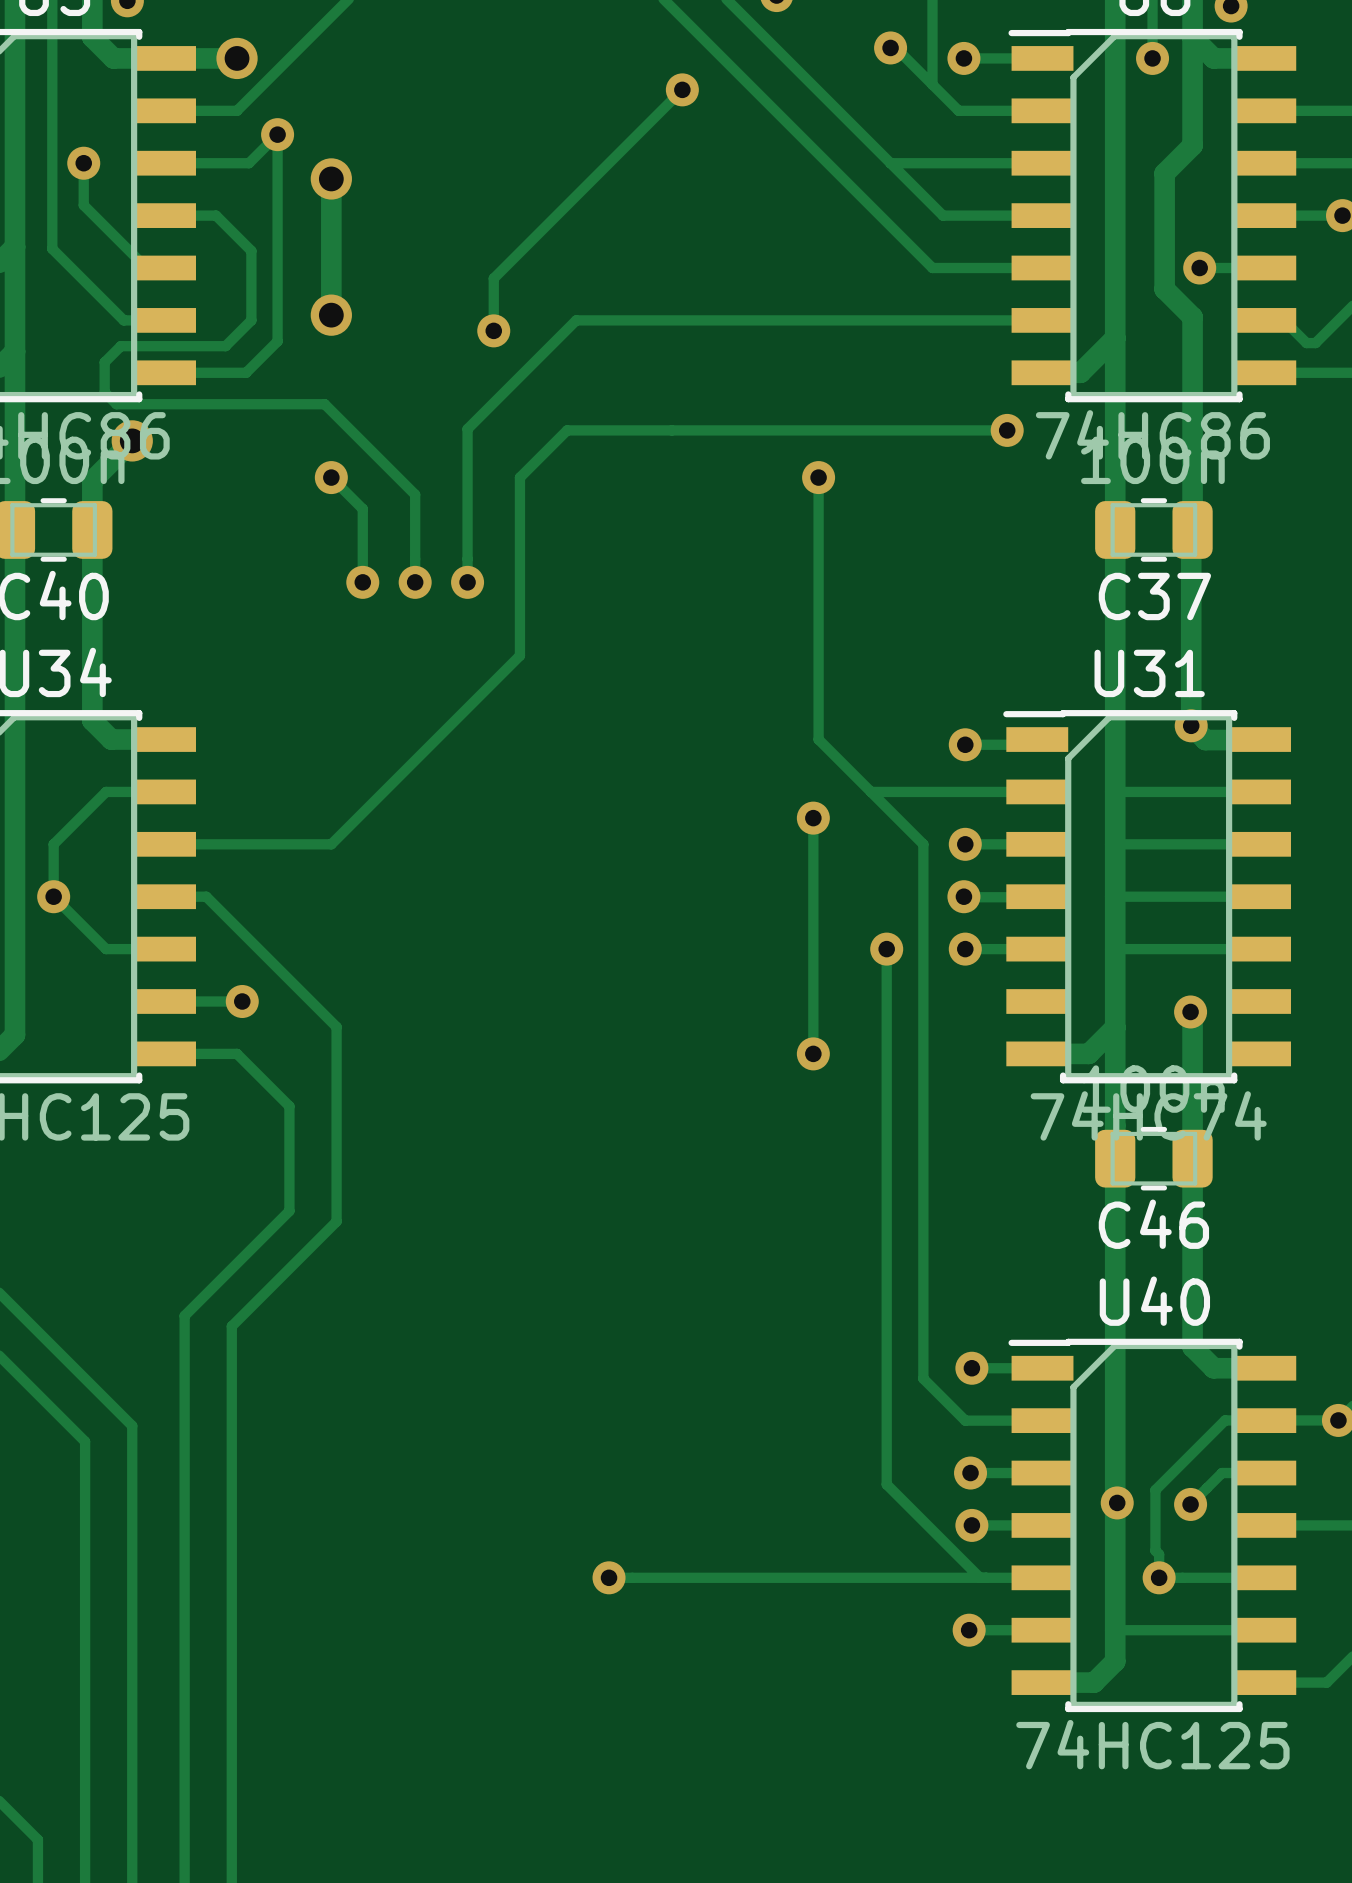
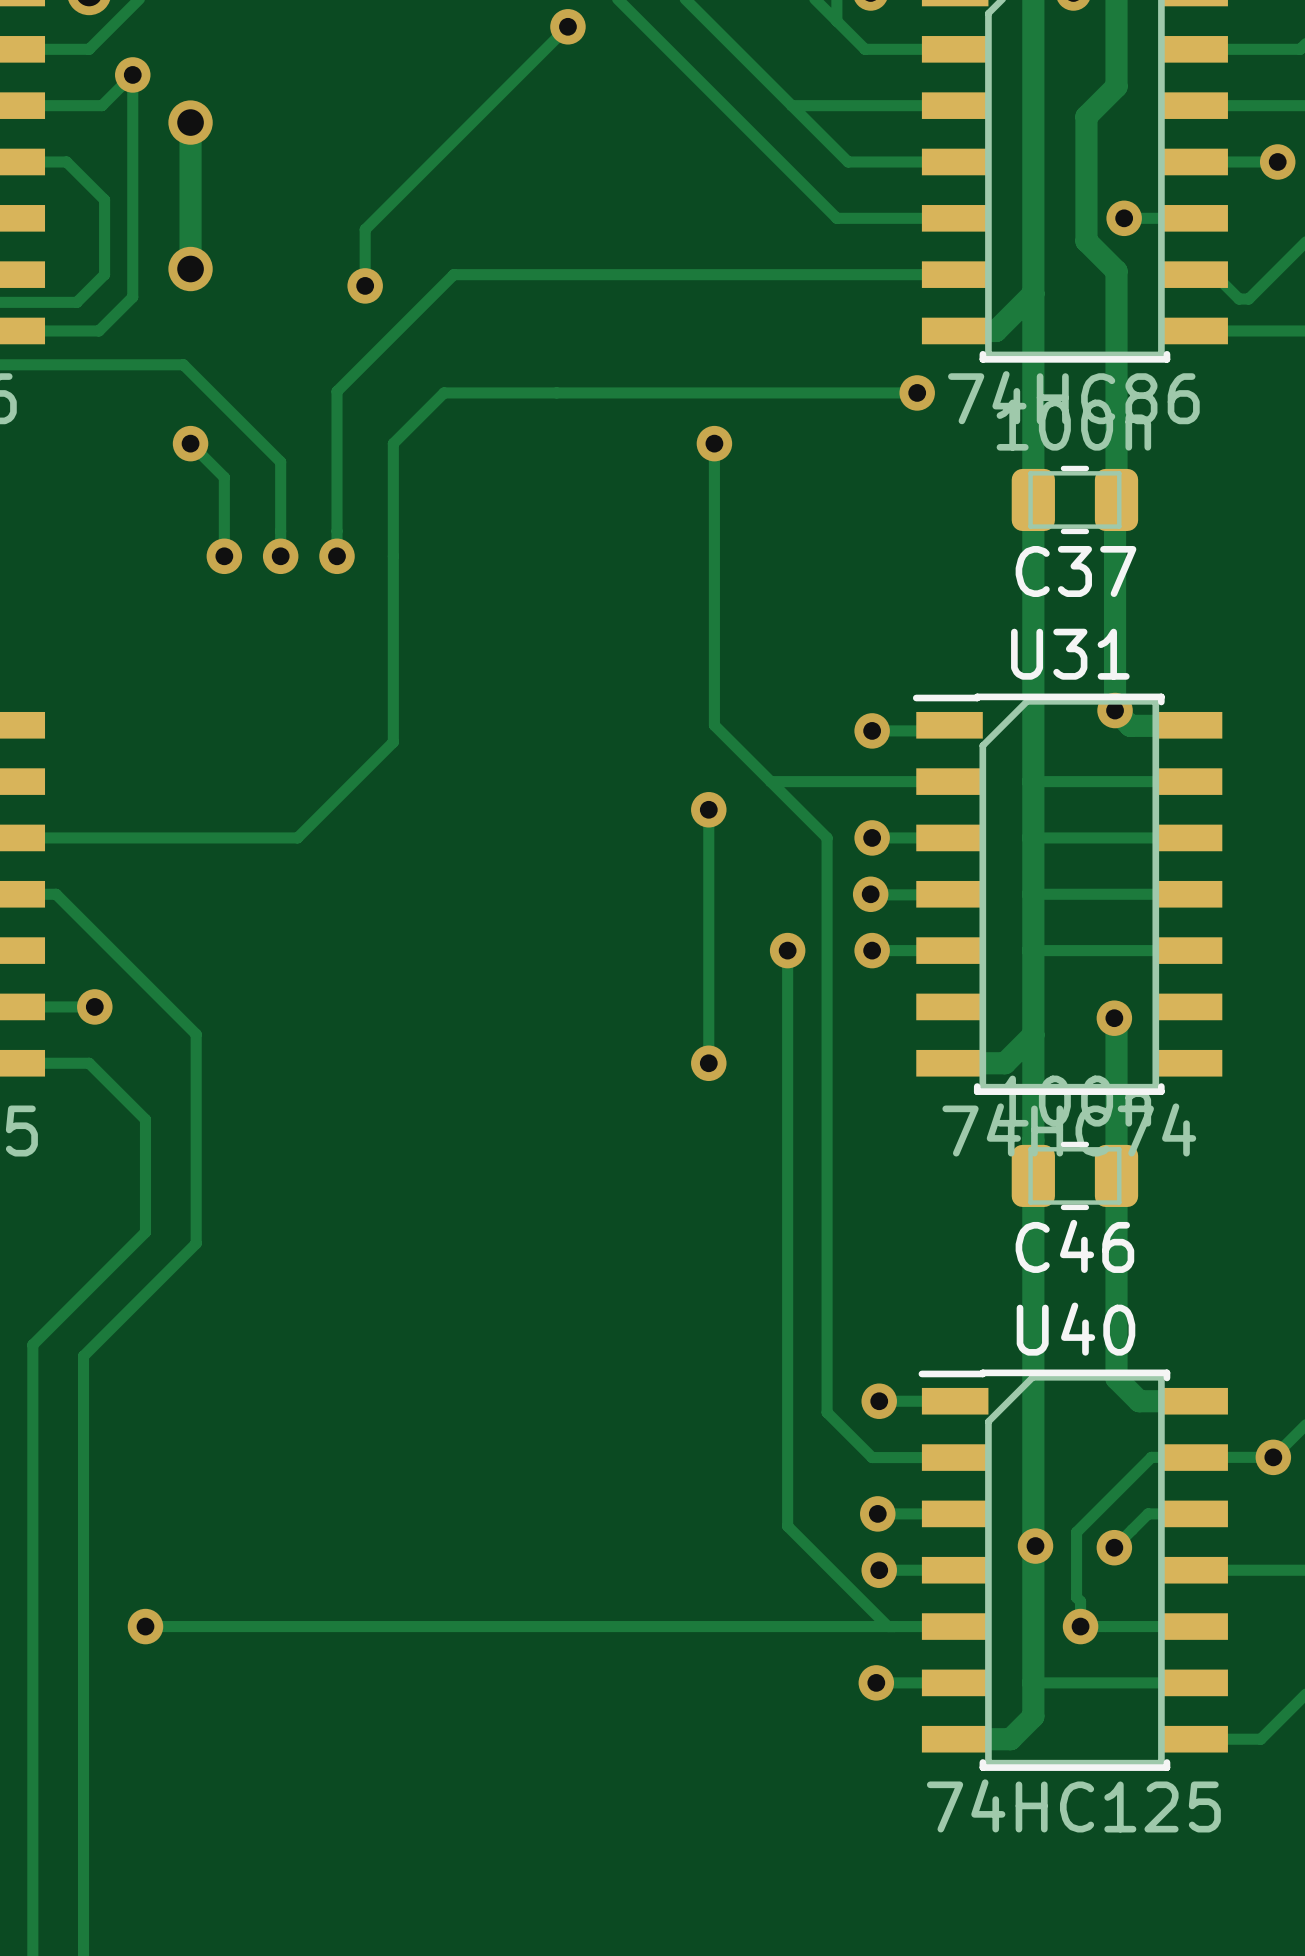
track: (519, 655) (331, 844) -> (393, 635) (393, 742) (297, 837) (190, 837)
track: none -> (145, 1626) (489, 1626)
via: none -> (145, 1626)
via: (609, 1577) -> none

